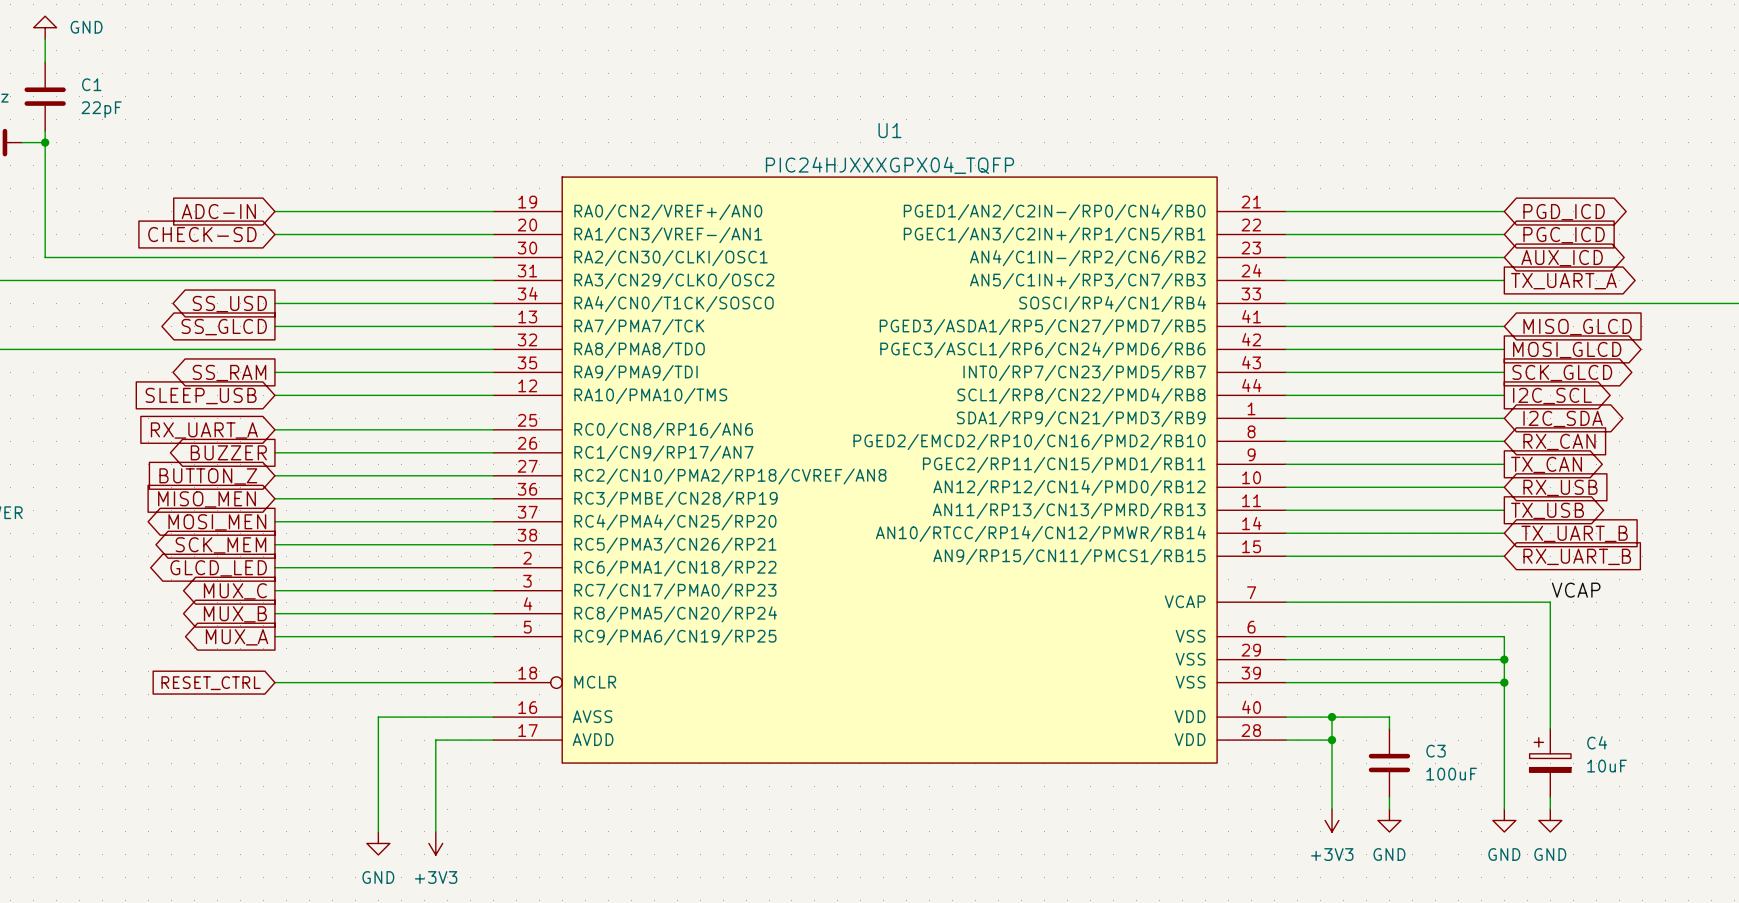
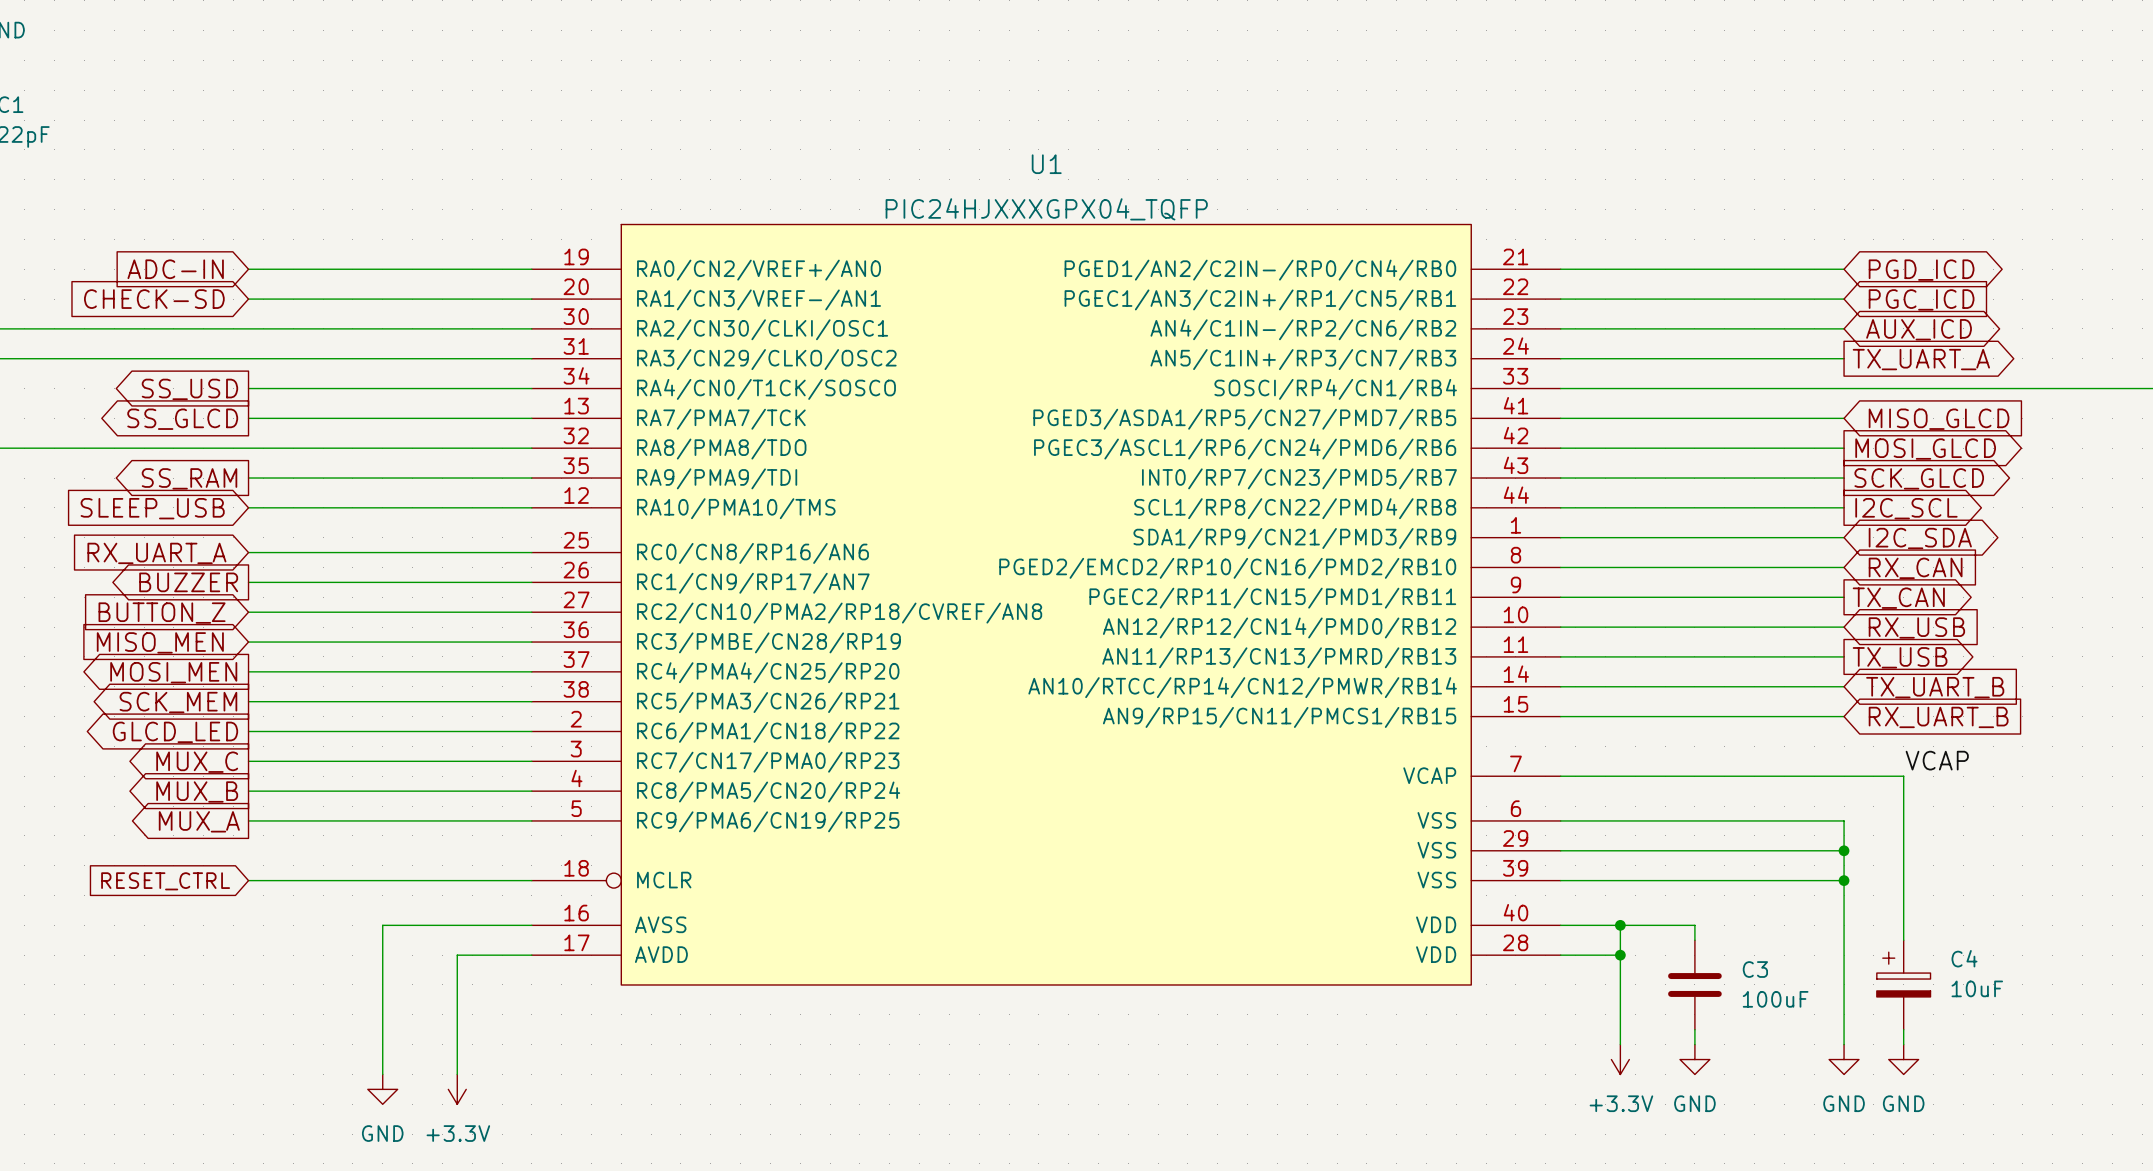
power symbol: +3V3 (1331, 820) -> +3.3V (1620, 1059)
power symbol: +3V3 (435, 843) -> +3.3V (457, 1089)

